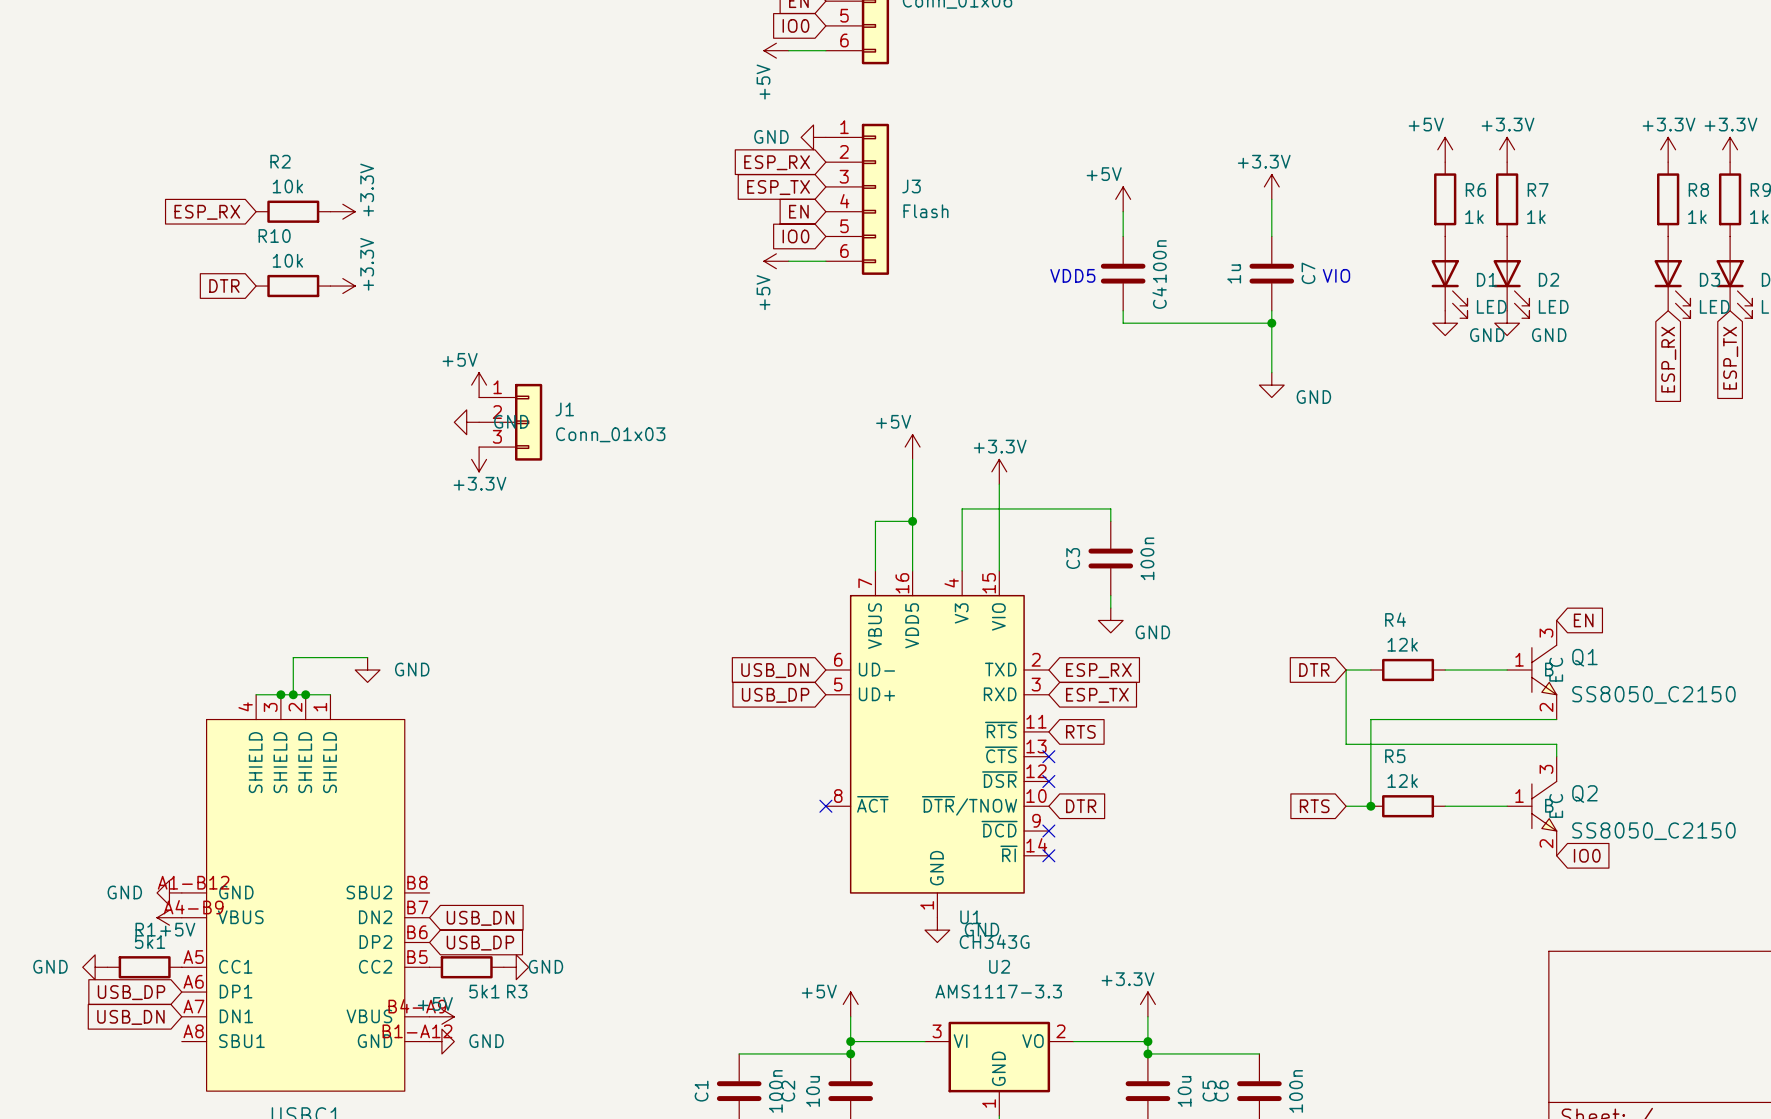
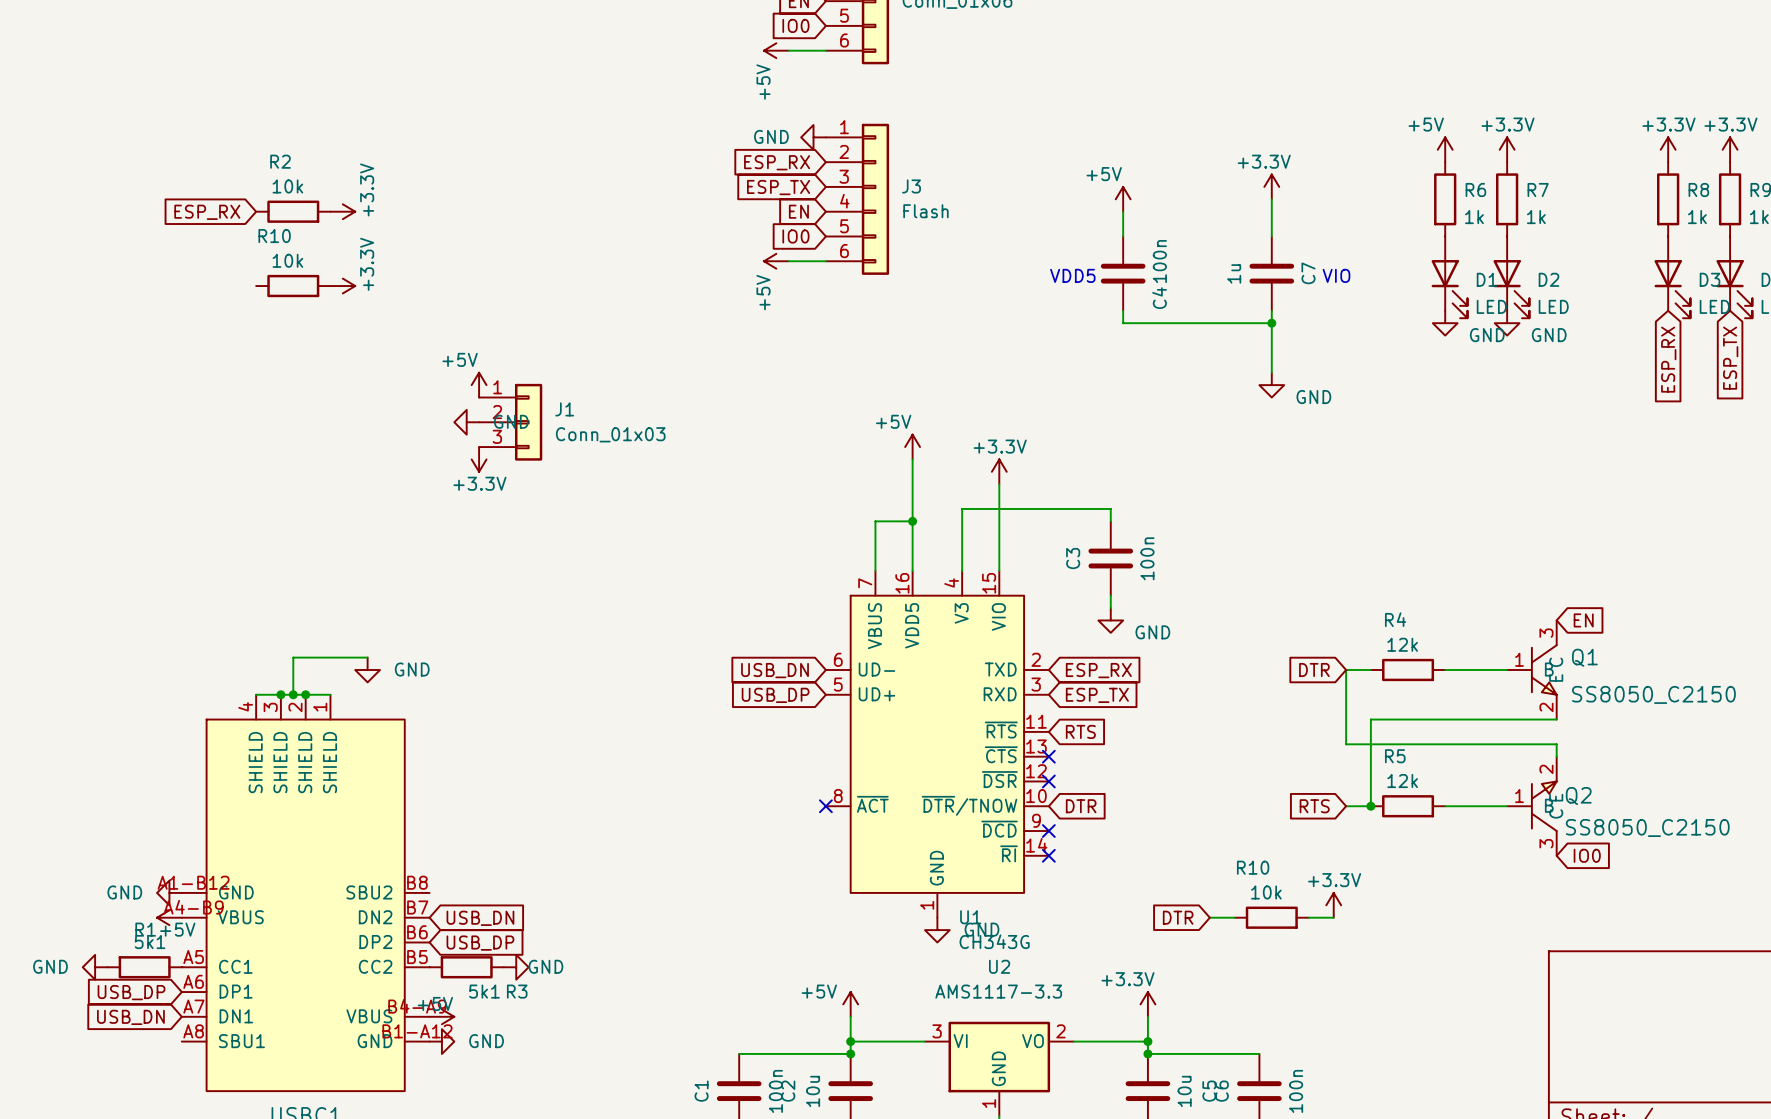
global label: DTR (224, 286) -> none
Q2 flip: as is (1544, 806) -> up-down (1544, 806)
power symbol: none -> +3.3V (1333, 905)
global label: none -> DTR (1178, 917)
wire: none -> (1209, 917) (1234, 917)
R10: none -> 10k (1271, 917)
wire: none -> (1308, 917) (1333, 917)

